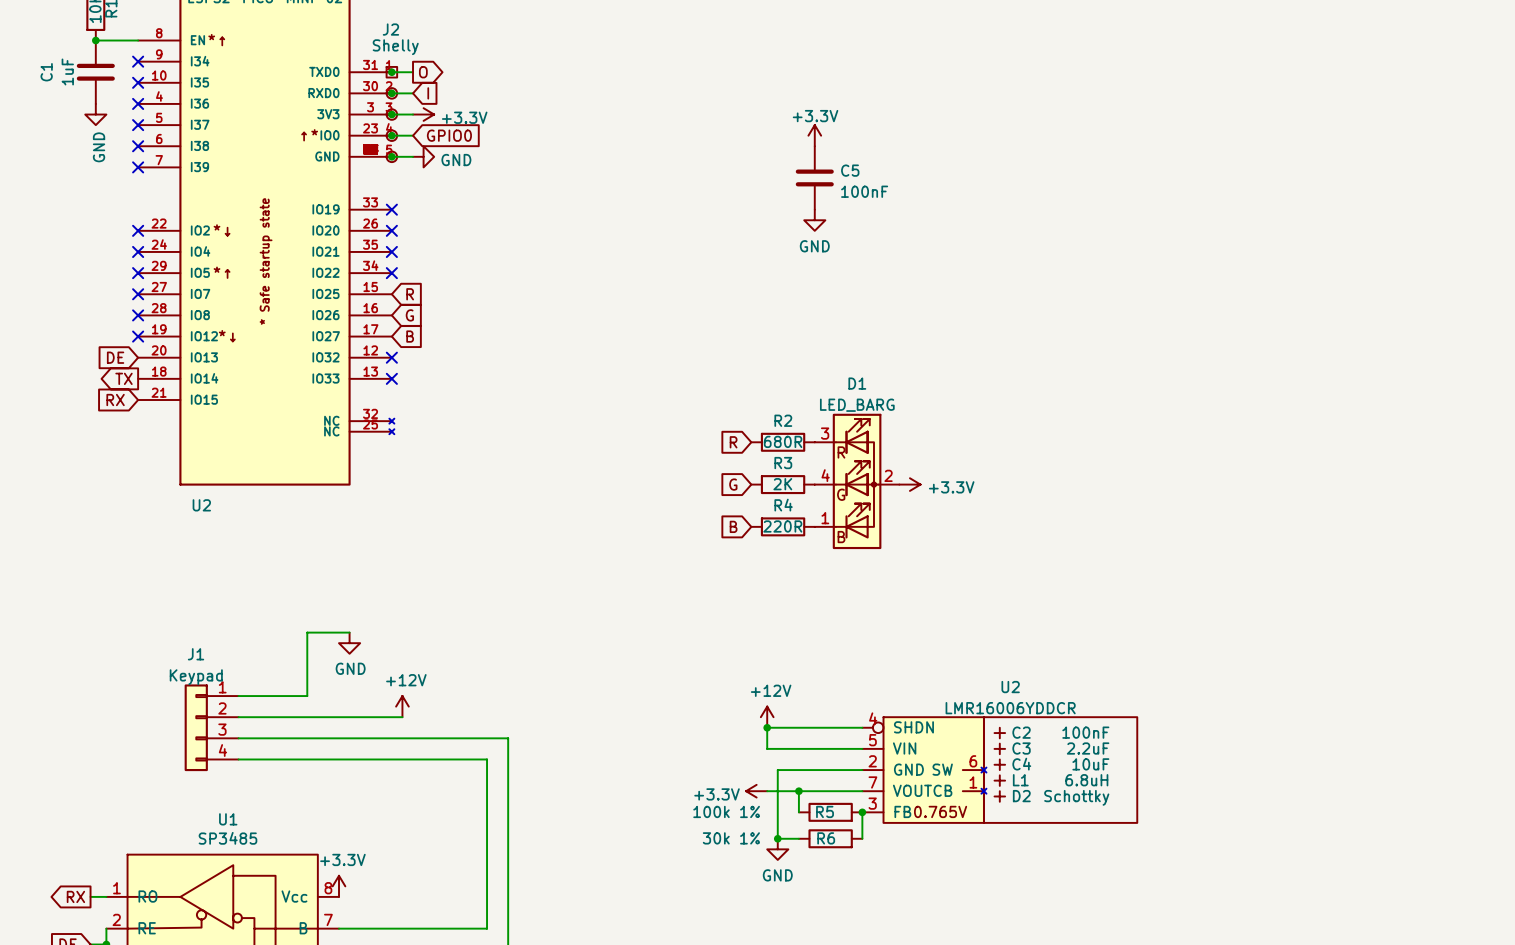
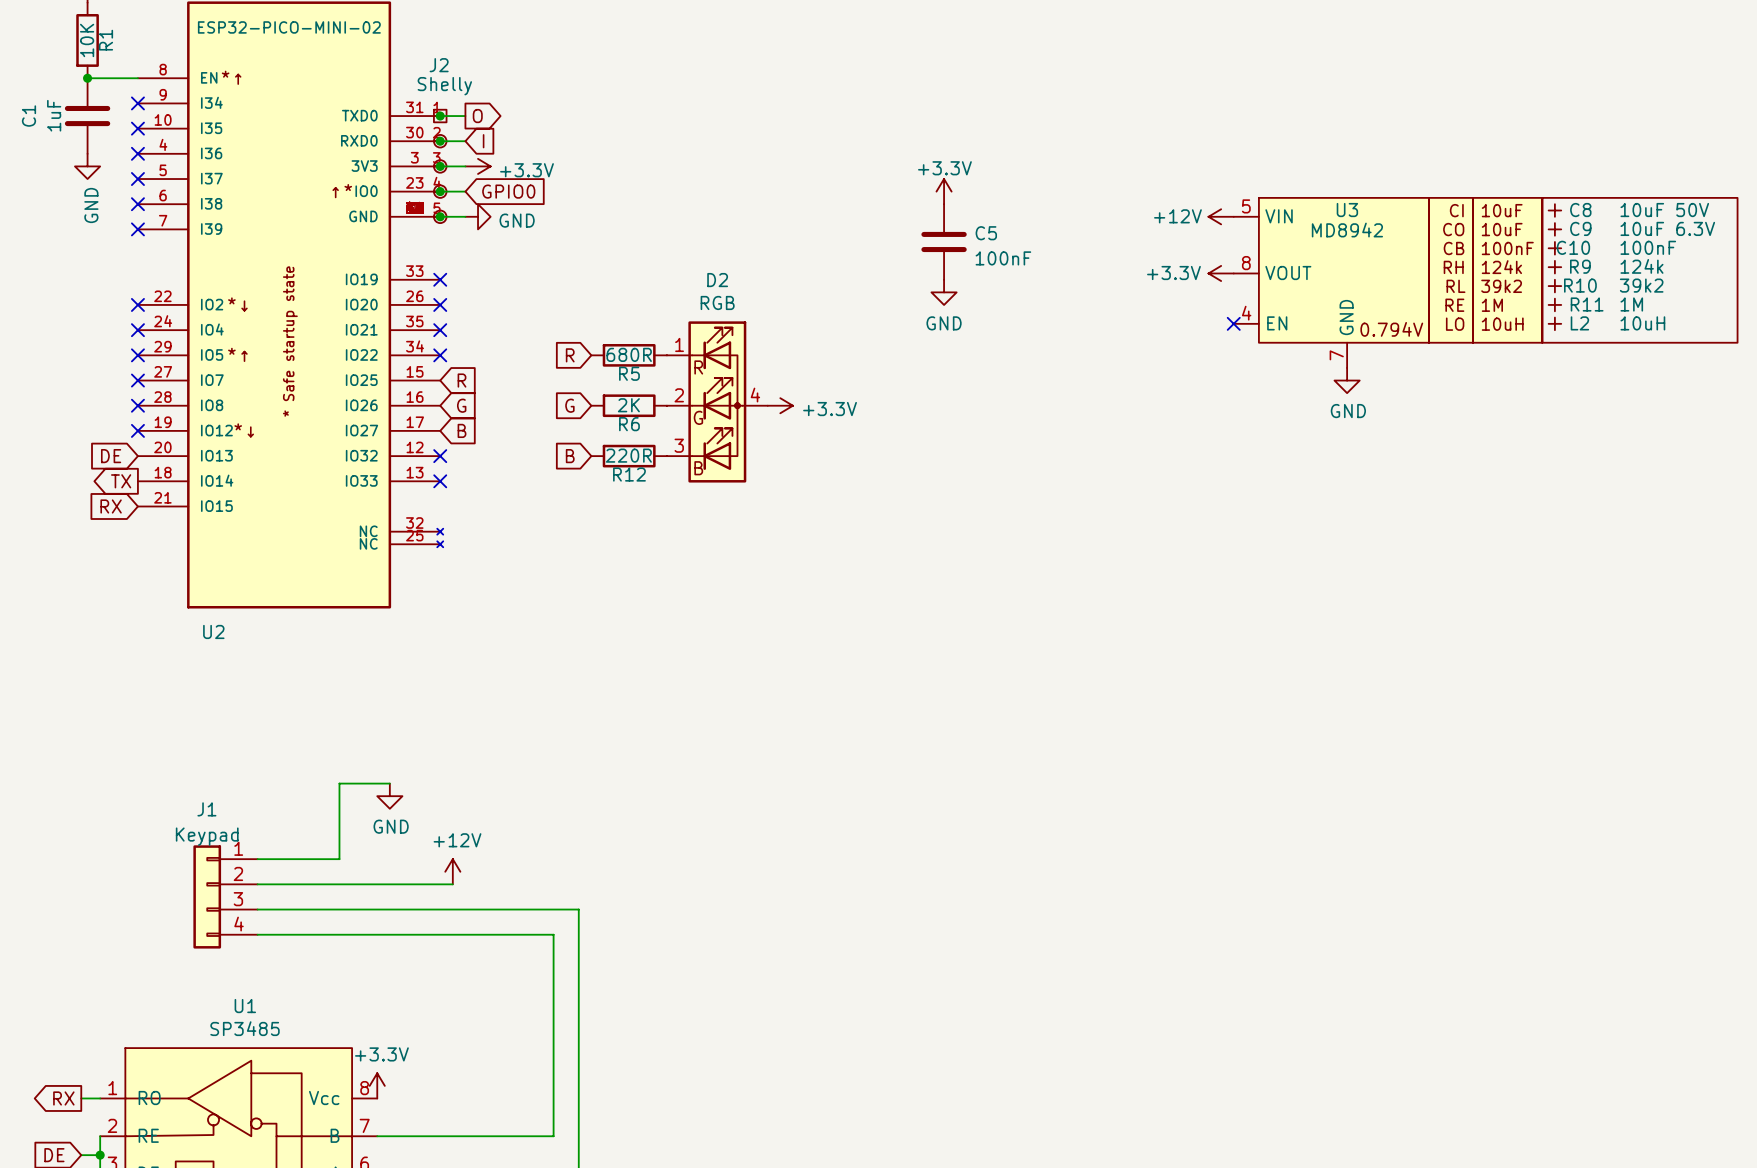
C8: none -> 10uF 50V (1554, 210)
power symbol: none -> +12V (1221, 216)
C9: none -> 10uF 6.3V (1554, 229)
C10: none -> 100nF (1554, 248)
R9: none -> 124k (1554, 267)
power symbol: none -> +3.3V (1221, 273)
U3: none -> MD8942 (1485, 282)
R10: none -> 39k2 (1554, 286)
R11: none -> 1M (1554, 304)
no-connect mark: none -> (1233, 323)
L2: none -> 10uH (1554, 323)
global label: none -> R (570, 355)
power symbol: none -> GND (1347, 380)
global label: none -> G (569, 405)
power symbol: none -> +3.3V (780, 405)
global label: none -> B (570, 456)
R12: none -> 220R (629, 456)
global label: R (733, 442) -> none
R2: 680R (783, 442) -> none
D1: LED_BARG (857, 481) -> none
global label: G (733, 484) -> none
R3: 2K (783, 484) -> none
power symbol: +3.3V (909, 484) -> none
global label: B (733, 526) -> none
R4: 220R (783, 526) -> none
power symbol: +12V (767, 717) -> none
junction: (767, 727) -> none
wire: (862, 727) (767, 727) (767, 748) (862, 748) -> none
C2: 100nF (999, 733) -> none
C3: 2.2uF (999, 748) -> none
C4: 10uF (999, 764) -> none
wire: (862, 770) (777, 770) (777, 838) (798, 838) -> none
U2: LMR16006YDDCR (999, 770) -> none
L1: 6.8uH (999, 780) -> none
D2 symbol: [993, 790, 1006, 803] -> [666, 321, 768, 483]
power symbol: +3.3V (756, 791) -> none
wire: (767, 791) (862, 791) -> none
wire: (798, 791) (798, 812) -> none
junction: (798, 791) -> none
D2 name position: D2 (1021, 796) -> D2 (717, 280)
D2 value: Schottky (1076, 797) -> RGB (717, 302)
R5 value: 100k 1% (726, 811) -> 680R (629, 354)
R5 name position: R5 (825, 811) -> R5 (629, 373)
R5 position: (830, 812) -> (629, 355)
wire: (862, 812) (862, 838) -> none
junction: (862, 812) -> none
R6 value: 30k 1% (731, 838) -> 2K (628, 405)
junction: (777, 838) -> none
R6 name position: R6 (826, 838) -> R6 (629, 424)
R6 position: (830, 838) -> (629, 405)
power symbol: GND (777, 849) -> none

